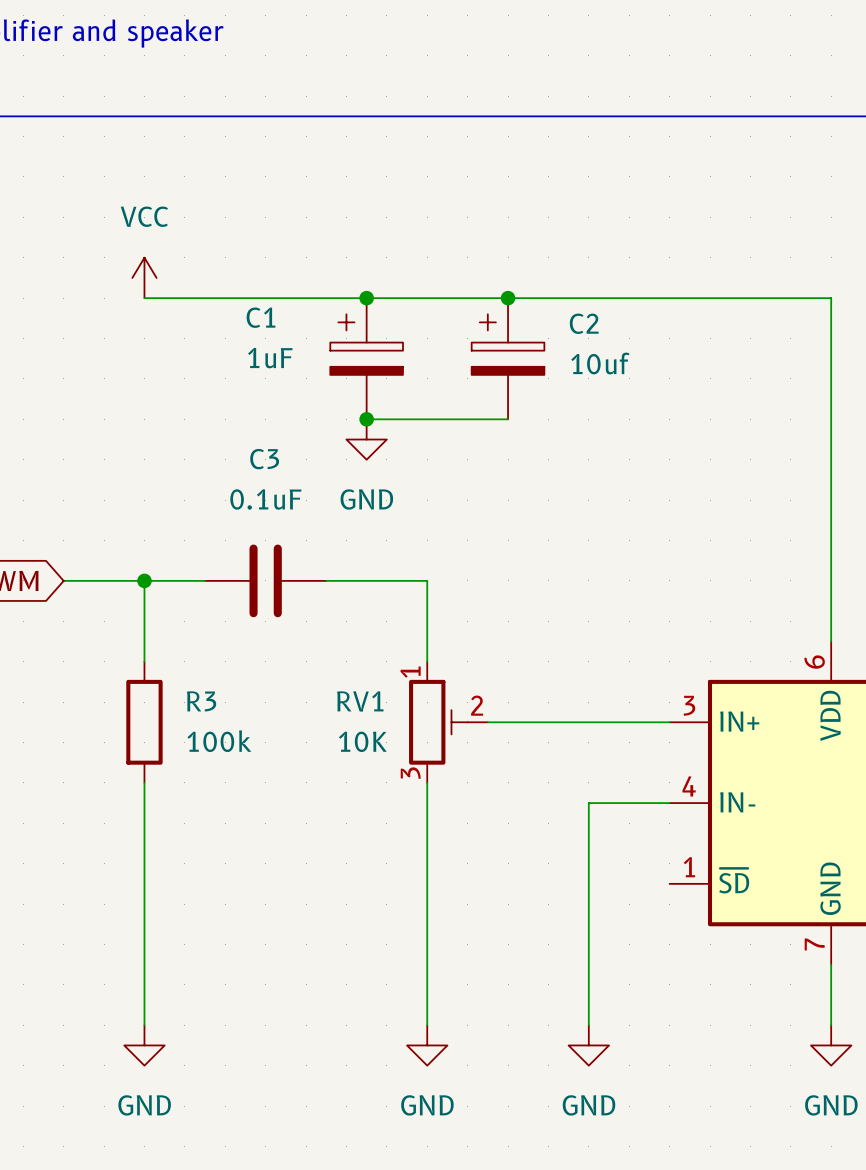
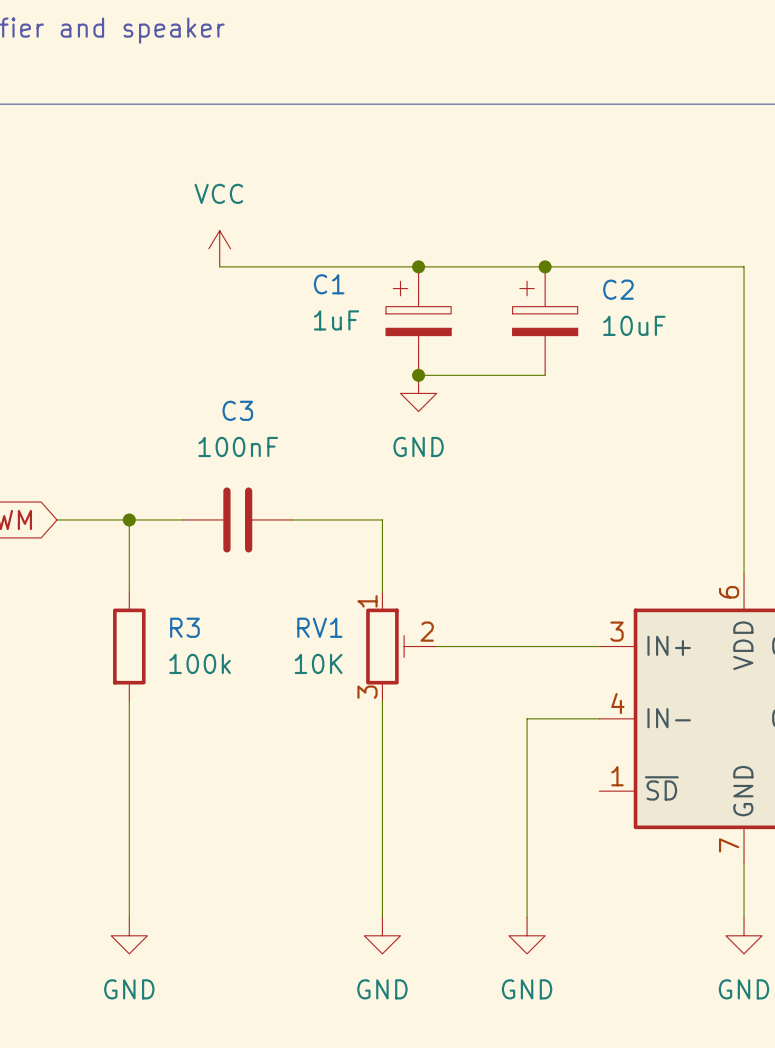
power symbol position: VCC (144, 277) -> VCC (219, 248)
wire: (144, 298) (245, 298) -> none
junction: (366, 298) -> none
junction position: (508, 298) -> (418, 266)
junction: none -> (545, 266)
C1 position: (366, 358) -> (418, 321)
C2 position: (508, 358) -> (545, 321)
C2 value: 10uf (600, 363) -> 10uF (634, 325)
wire: (366, 419) (467, 419) -> (454, 375) (545, 375)
junction: (366, 419) -> none
junction: none -> (418, 375)
power symbol position: GND (366, 439) -> GND (418, 393)
C3 value: 0.1uF (265, 499) -> 100nF (238, 446)

